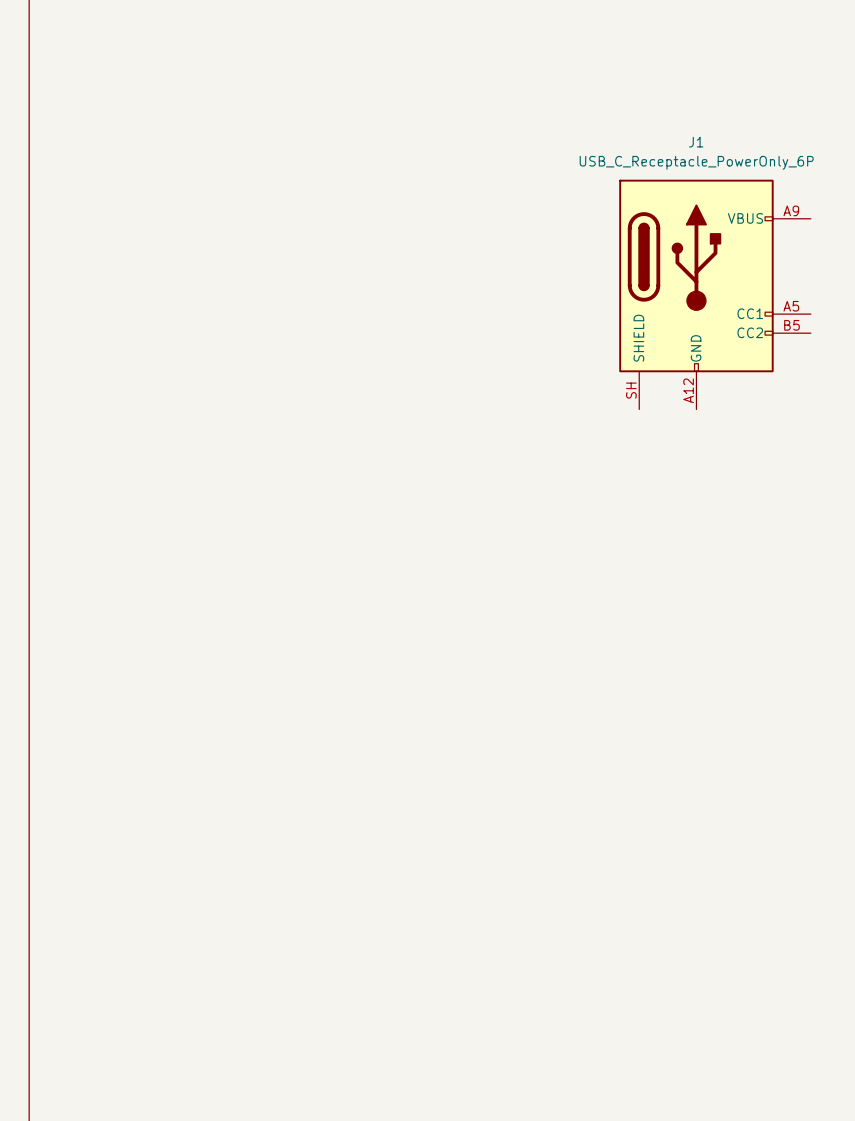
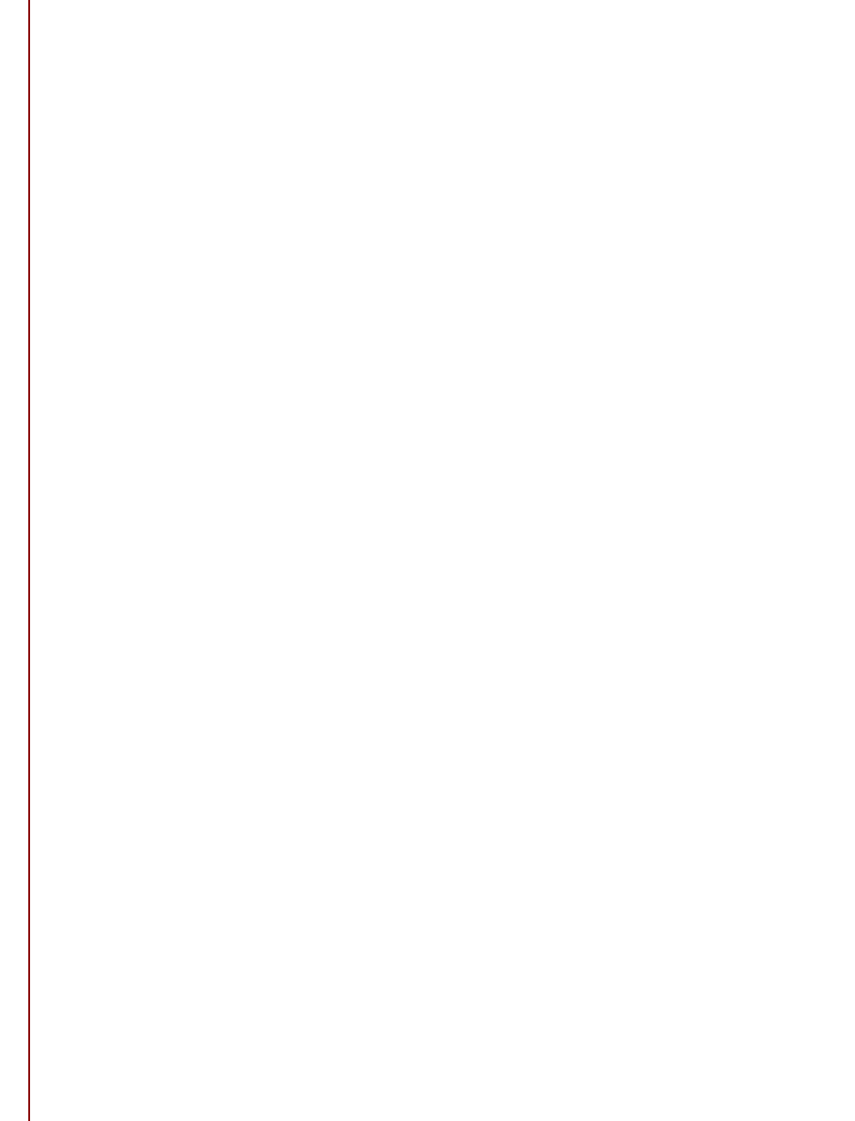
J1: USB_C_Receptacle_PowerOnly_6P (715, 294) -> none

